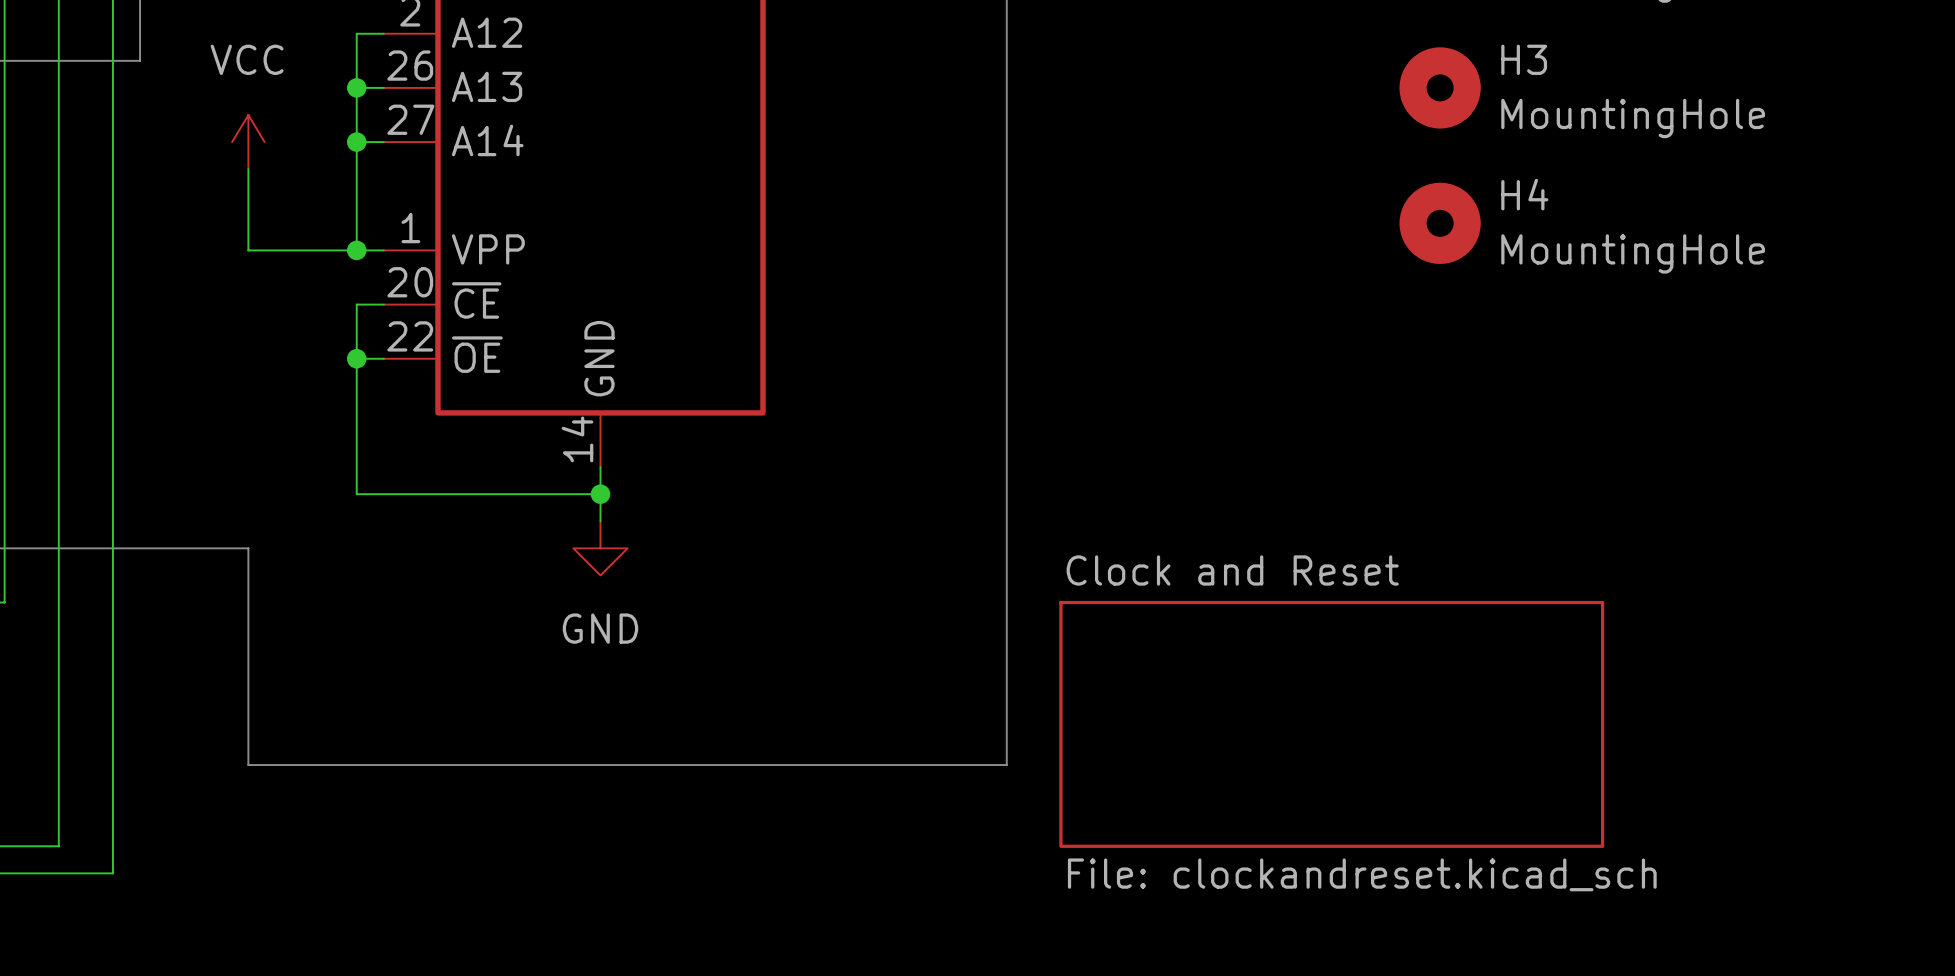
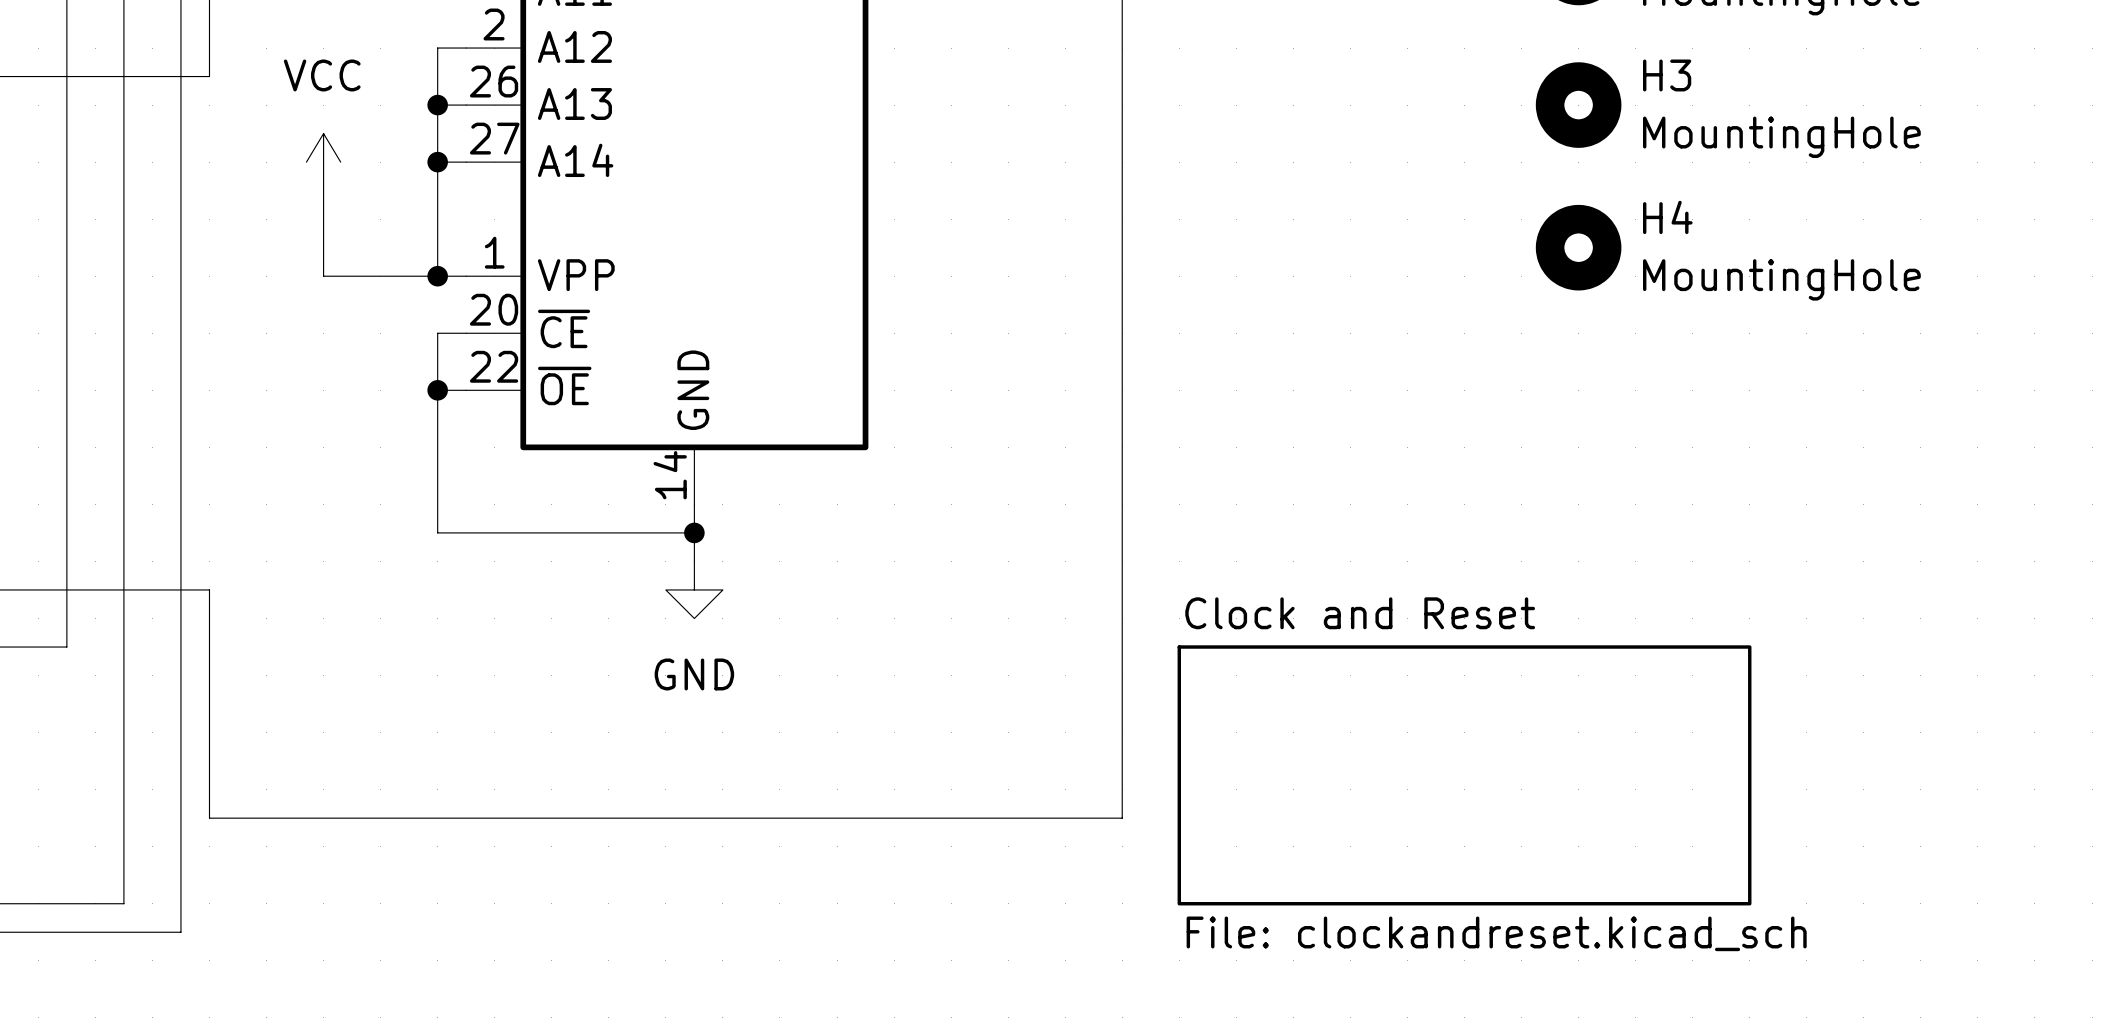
bus: (140, 548) (248, 548) (248, 765) -> (209, 589) (209, 818) (323, 818)

